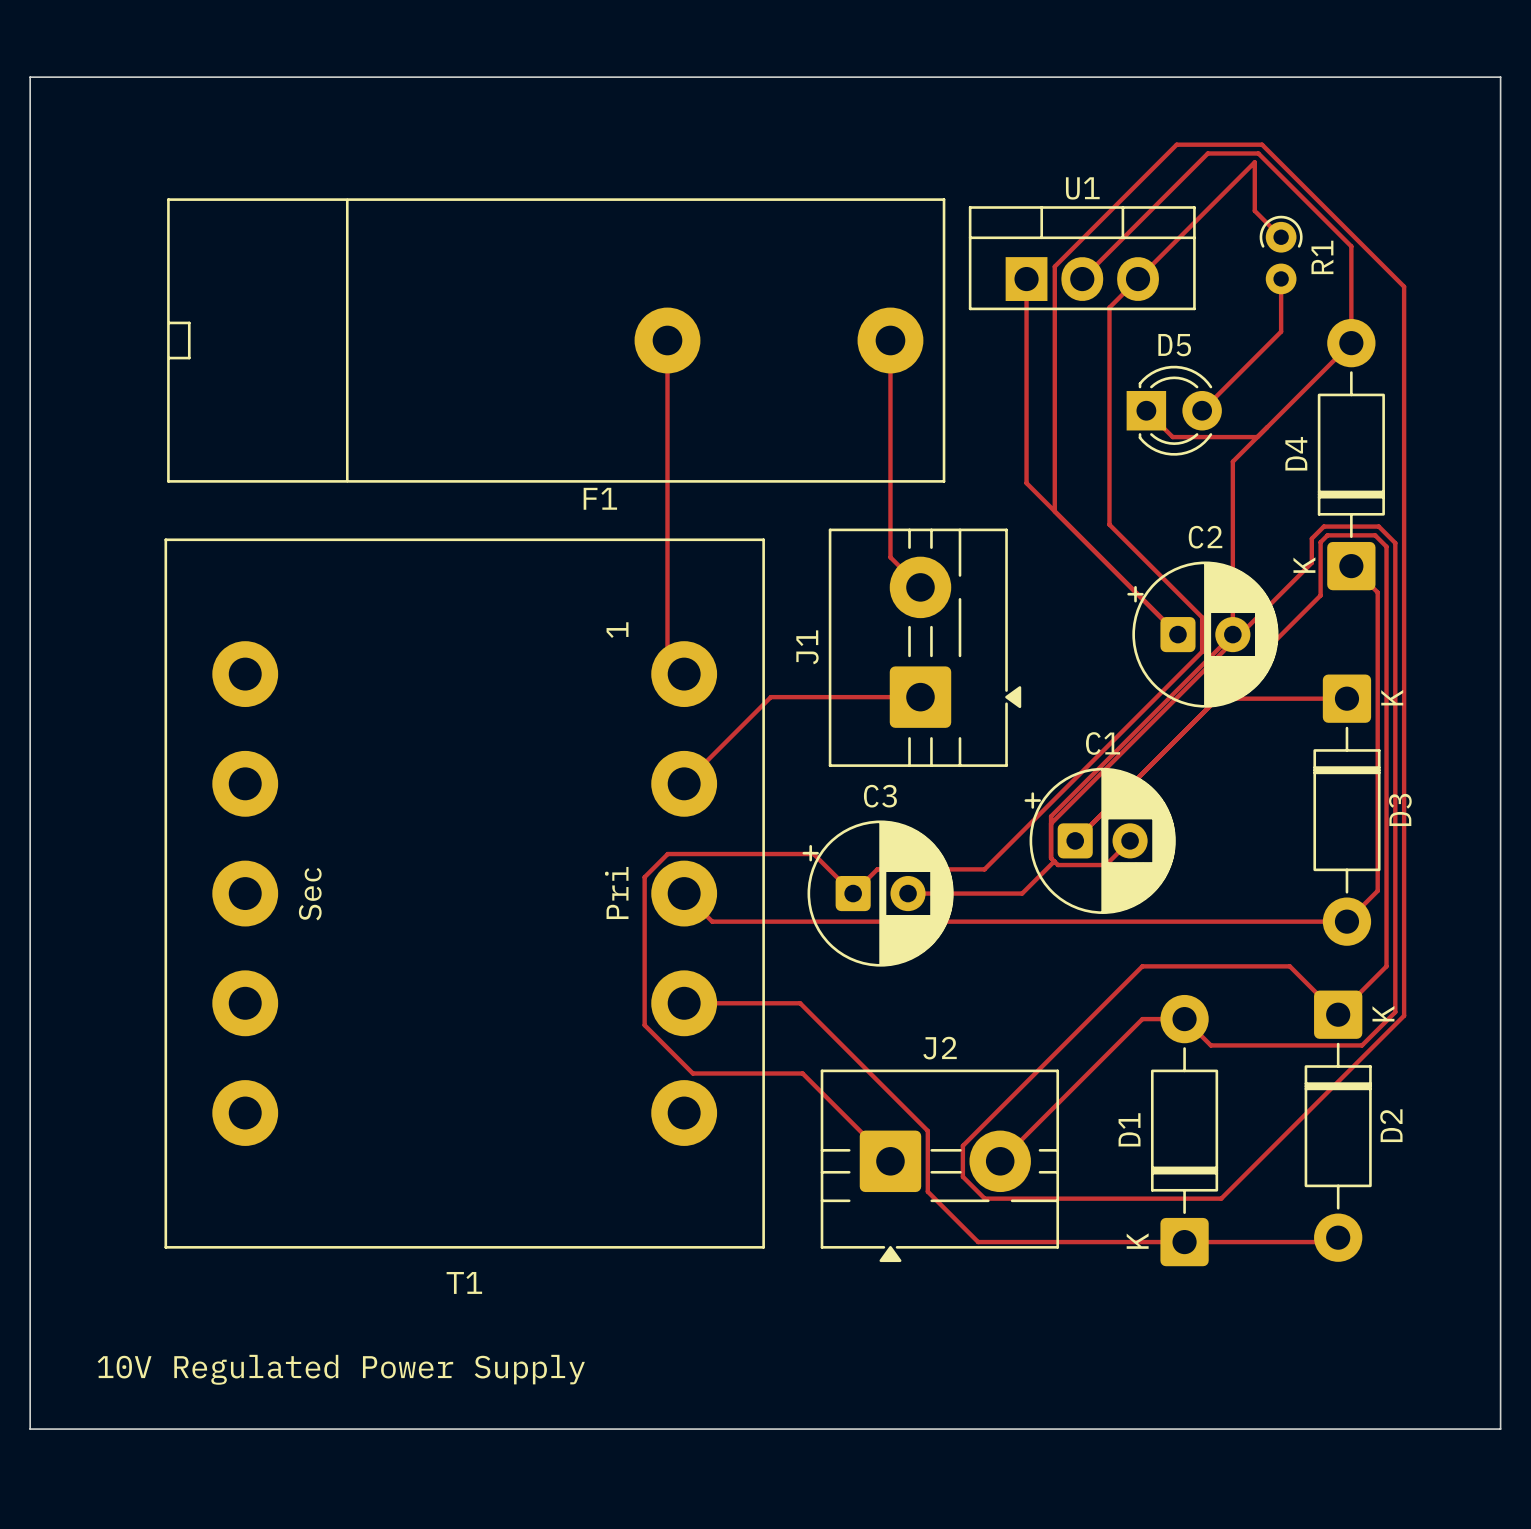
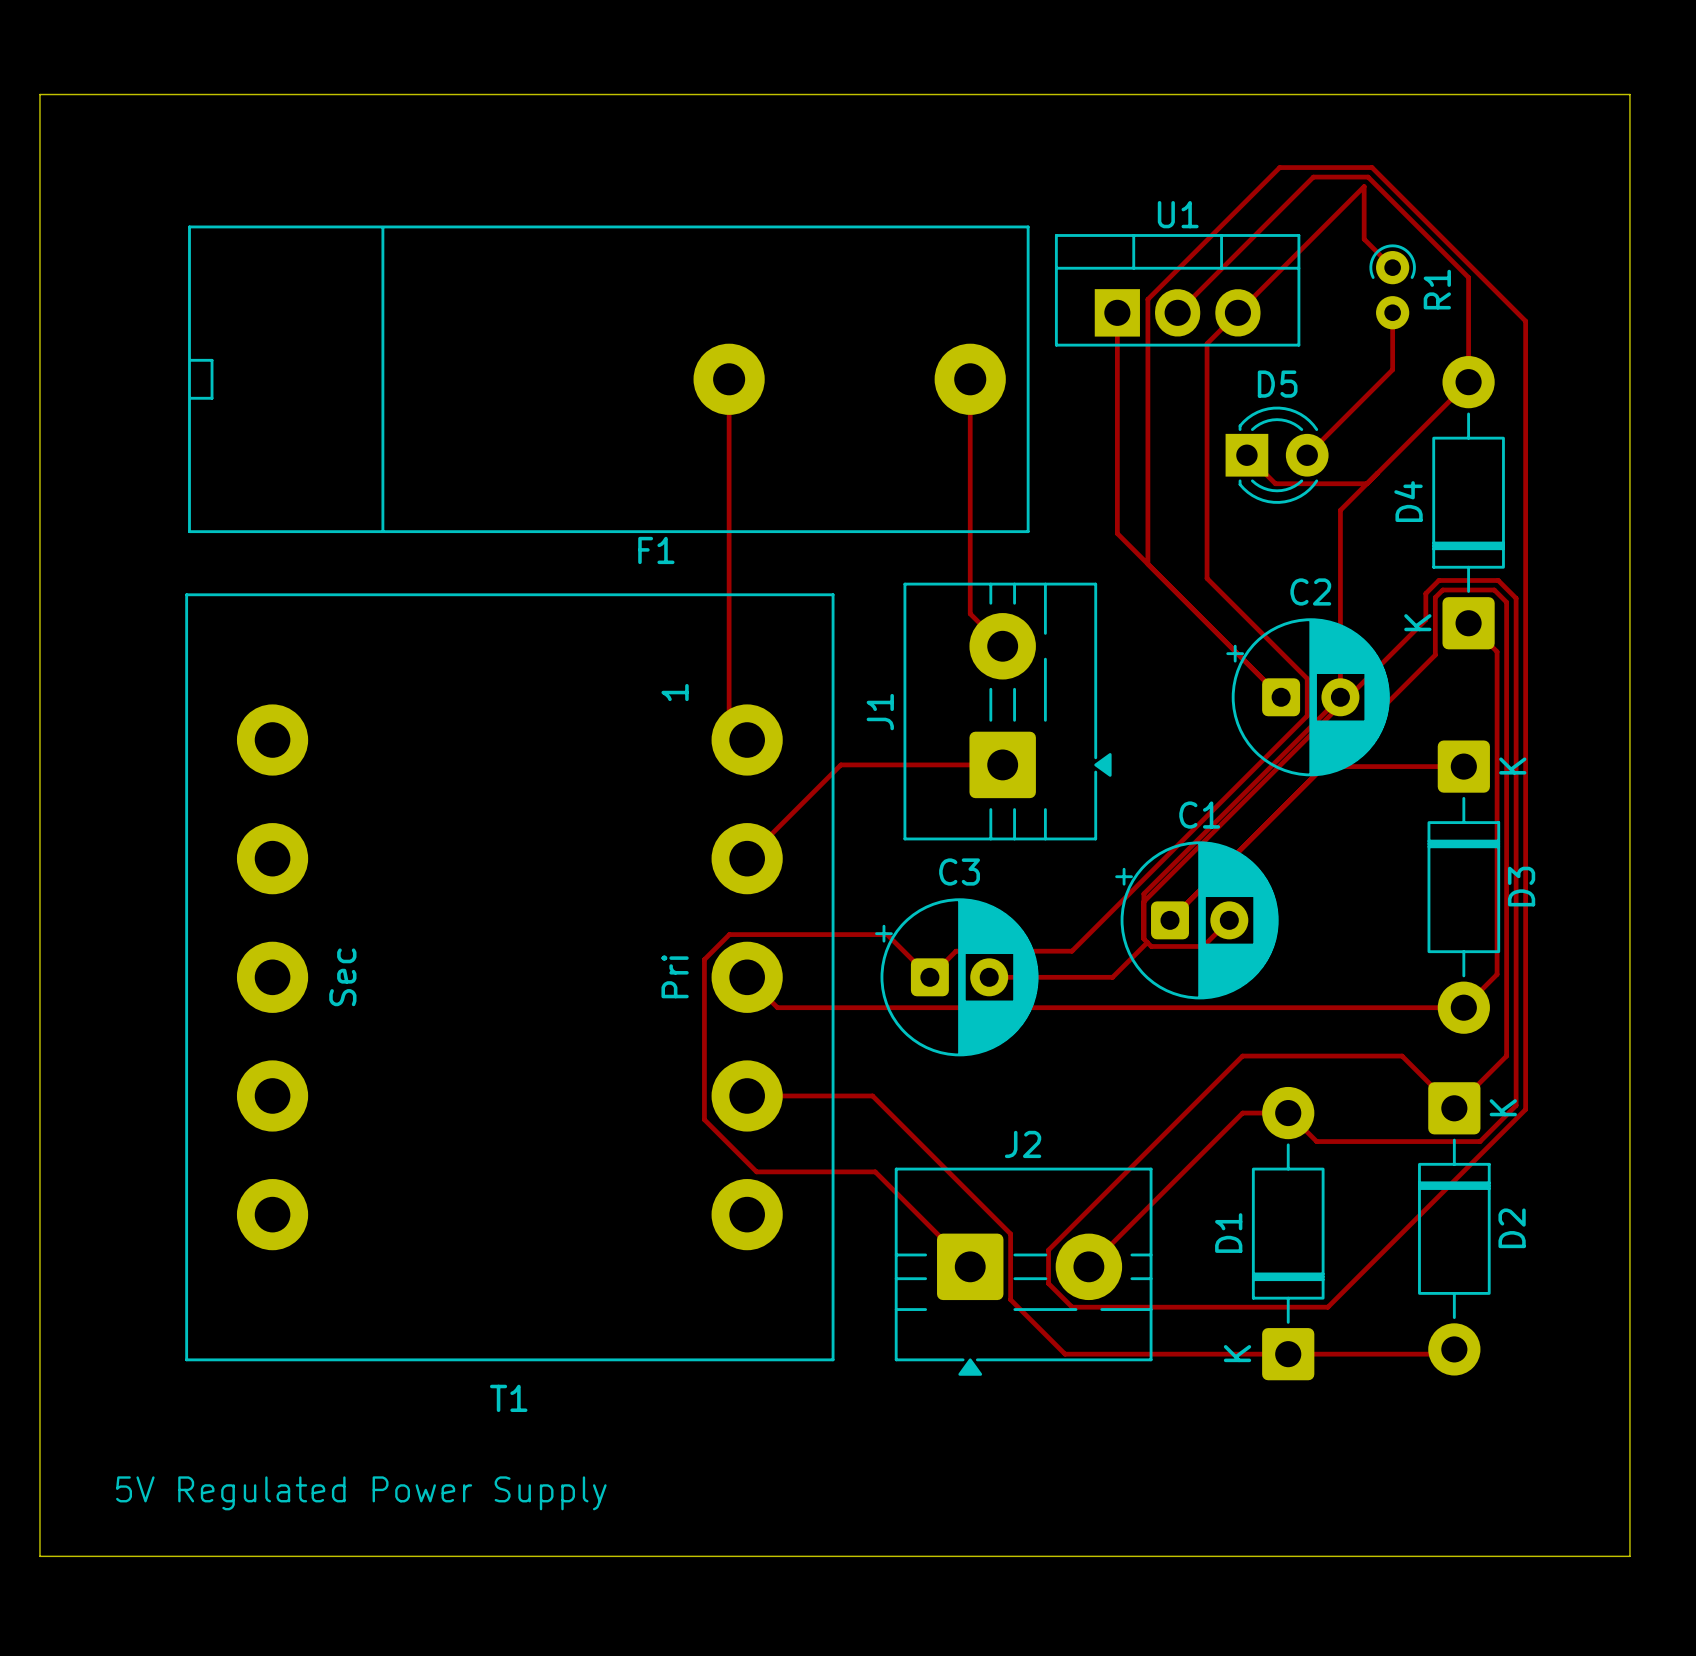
text: 10V Regulated Power Supply (341, 1369) -> 5V Regulated Power Supply (361, 1493)

